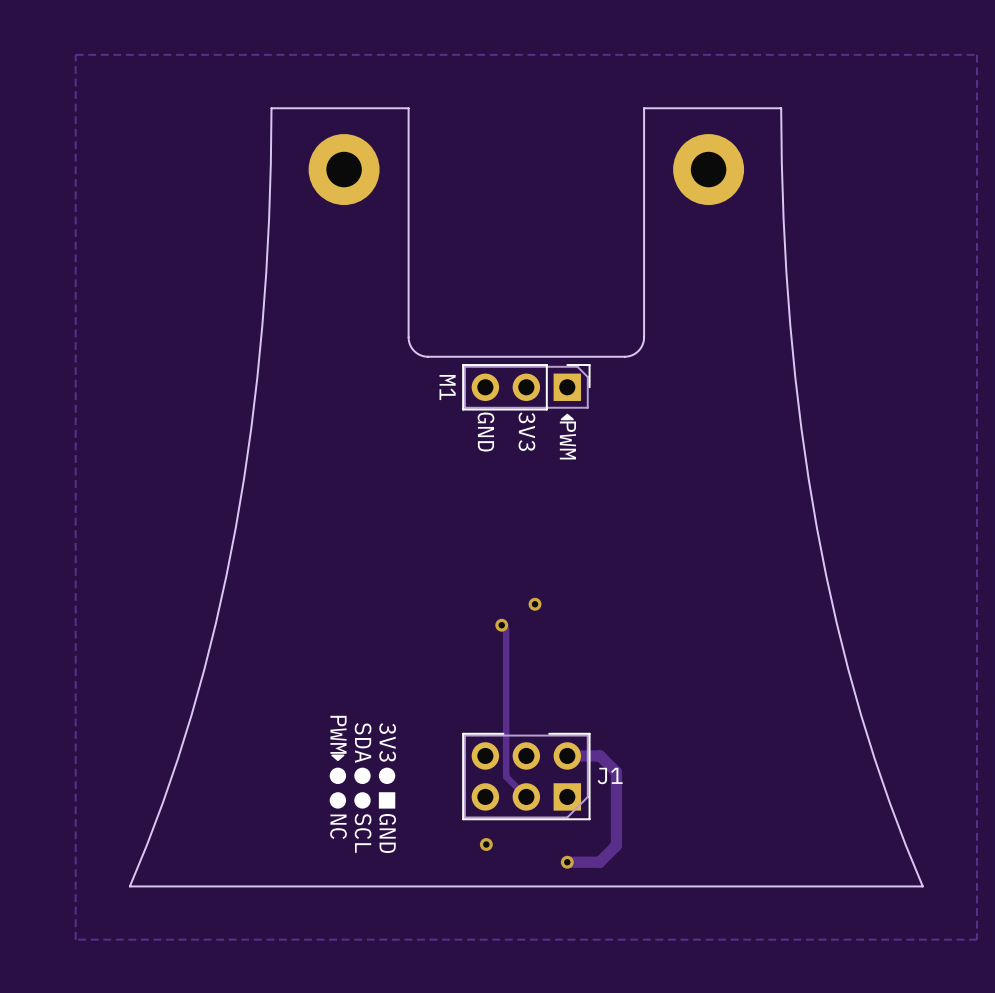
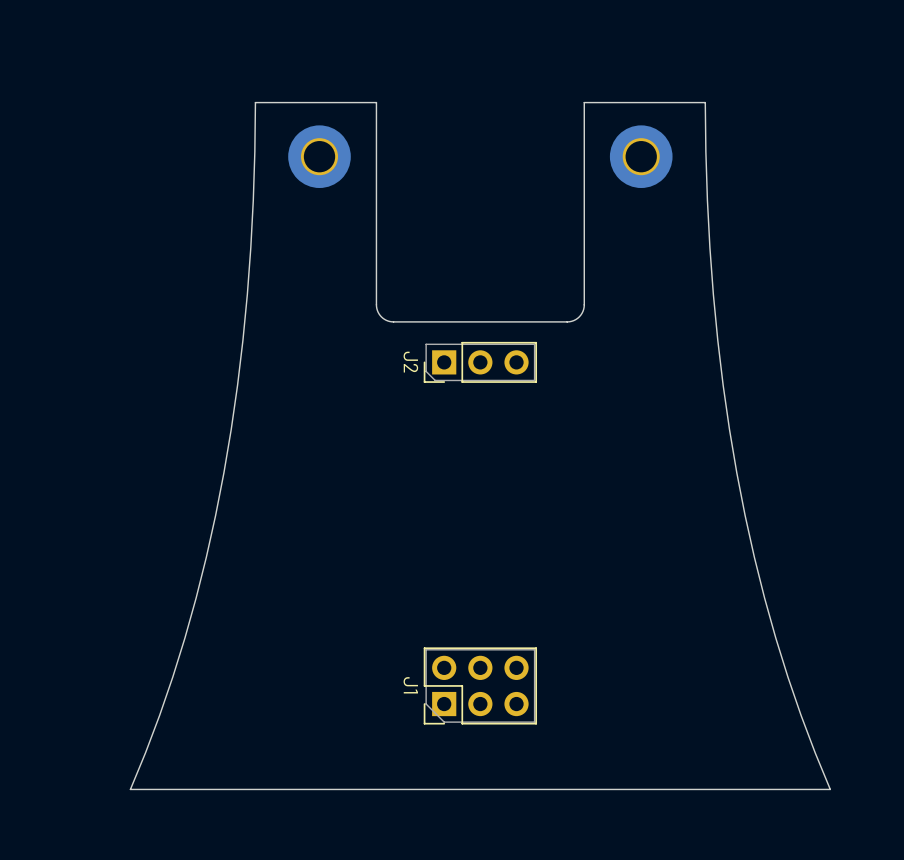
zone outline: (976, 54) (75, 54) (75, 939) (976, 939) (976, 54) -> none
M1: (526, 387) -> none
J2: none -> (480, 362)
drawing: [560, 413, 574, 421] -> none
text: 3V3 (526, 431) -> none
text: GND (485, 432) -> none
text: PWM (567, 440) -> none
via: (535, 604) -> none
track: (501, 625) (506, 629) (506, 776) (526, 796) -> none
via: (501, 625) -> none
J1 footprint: [462, 732, 591, 821] -> [423, 647, 538, 725]
drawing: [329, 754, 396, 809] -> none
track: (567, 755) (600, 755) (616, 772) (616, 845) (599, 862) (567, 862) -> none
J1 name position: J1 (610, 775) -> J1 (410, 685)
via: (486, 844) -> none
via: (567, 862) -> none

